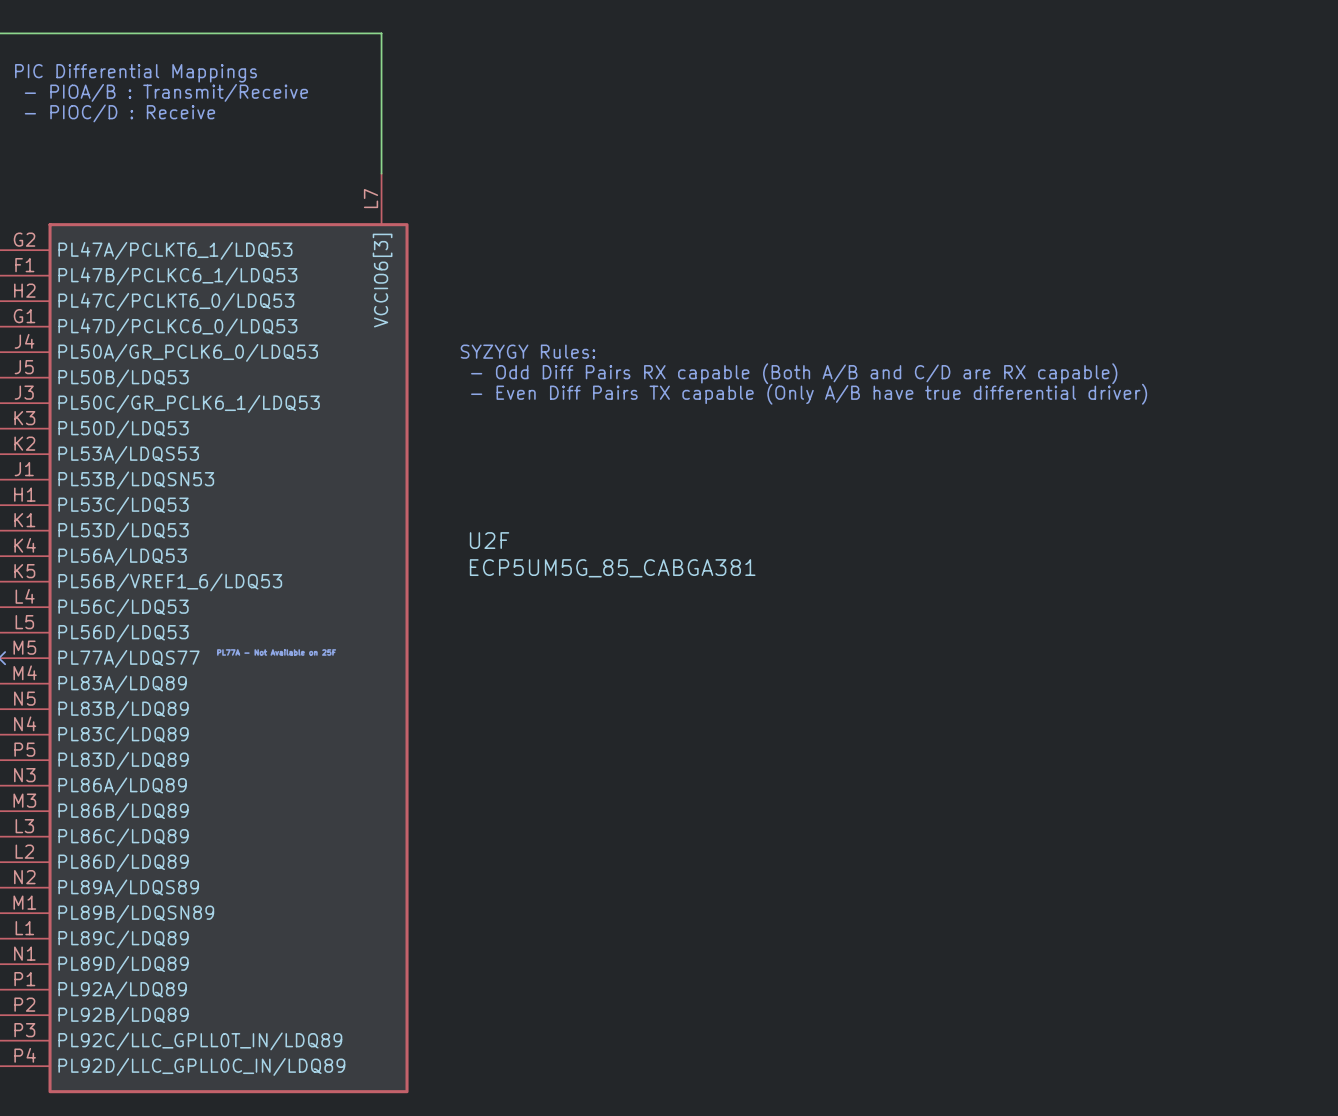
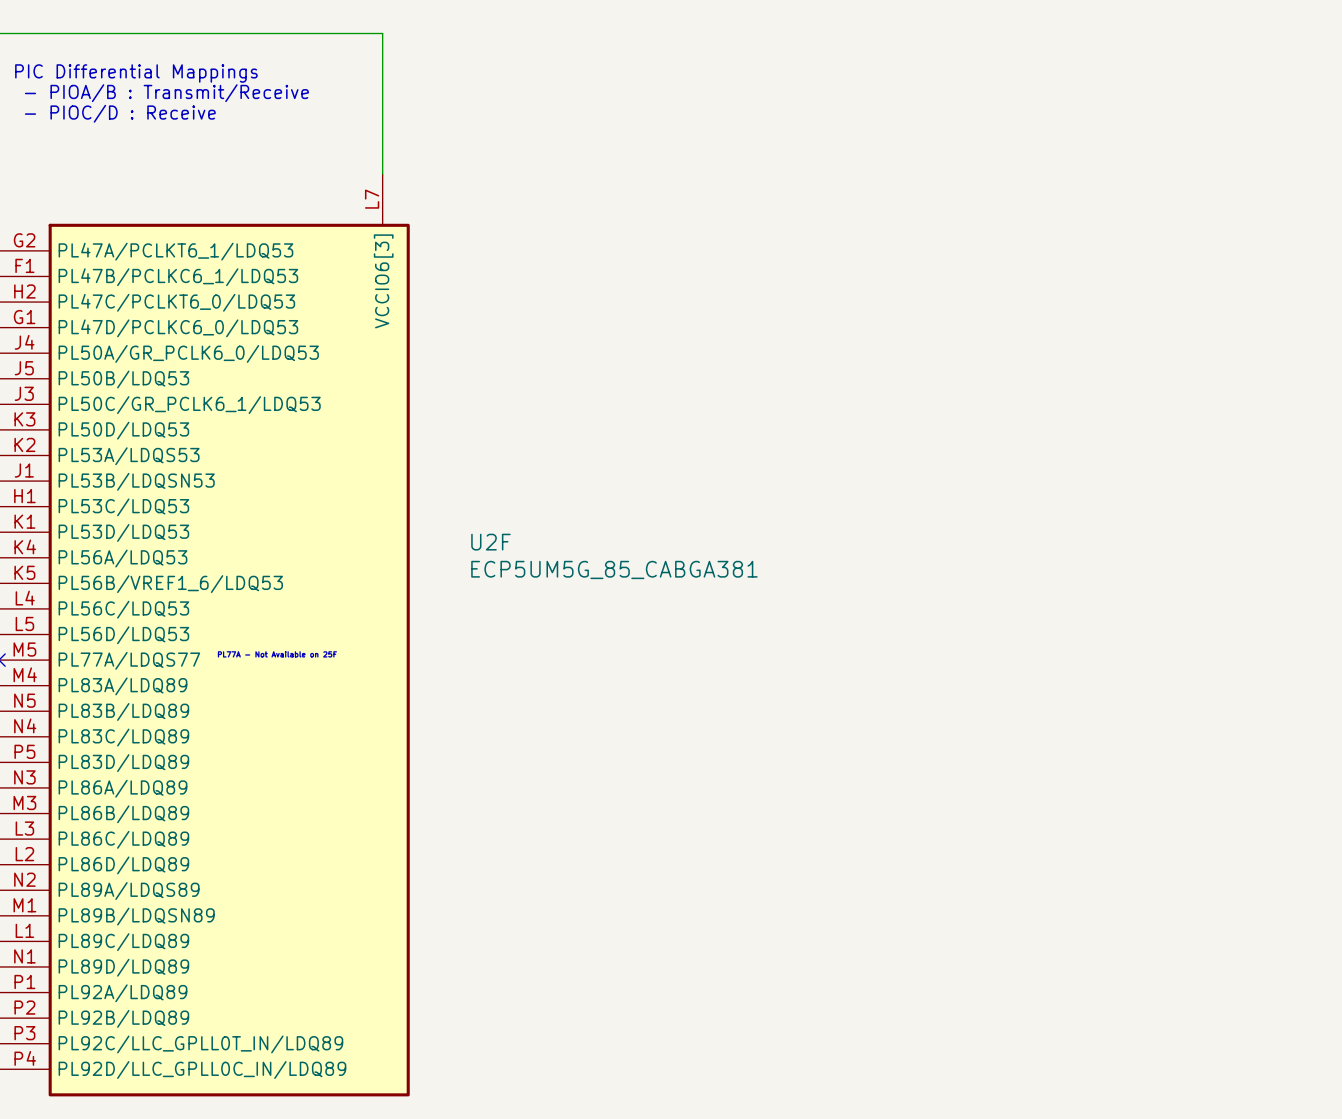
text: SYZYGY Rules: (527, 351) -> none
text: - Odd Diff Pairs RX capable (Both A/B and C/D are RX capable) (794, 373) -> none
text: - Even Diff Pairs TX capable (Only A/B have true differential driver) (809, 394) -> none

